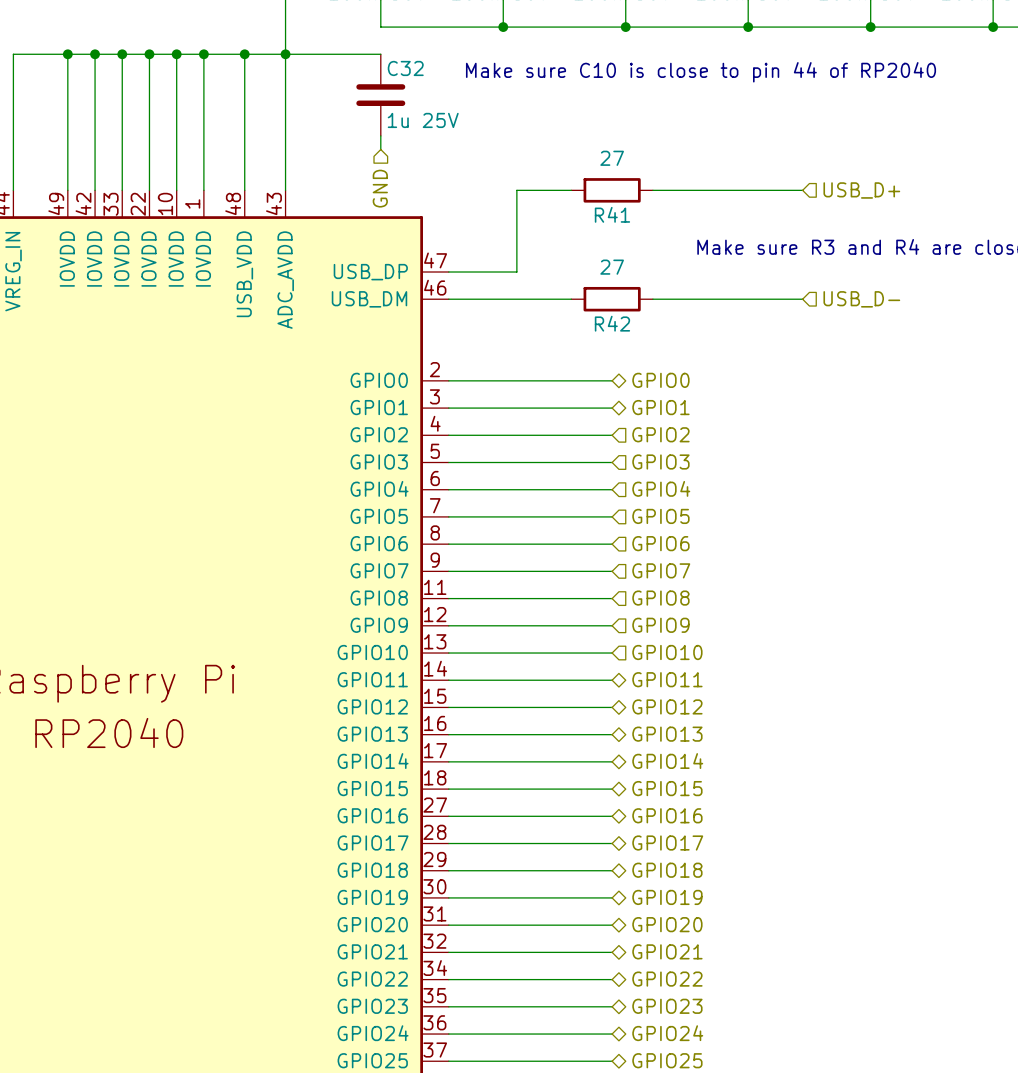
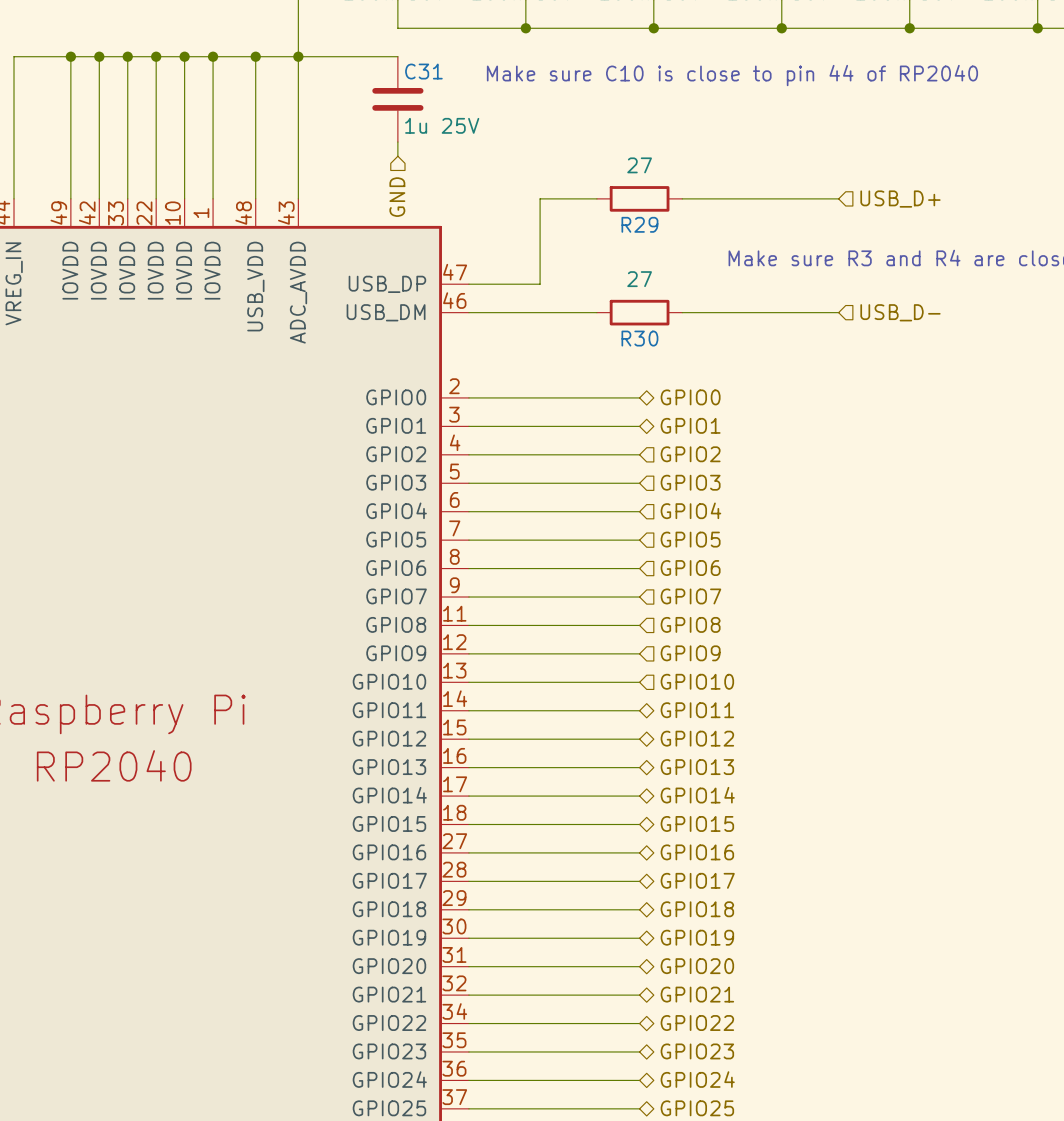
C32 name: C32 (405, 68) -> C31 (423, 71)
R41 name: R41 (612, 214) -> R29 (639, 224)
R42 name: R42 (612, 323) -> R30 (639, 338)

